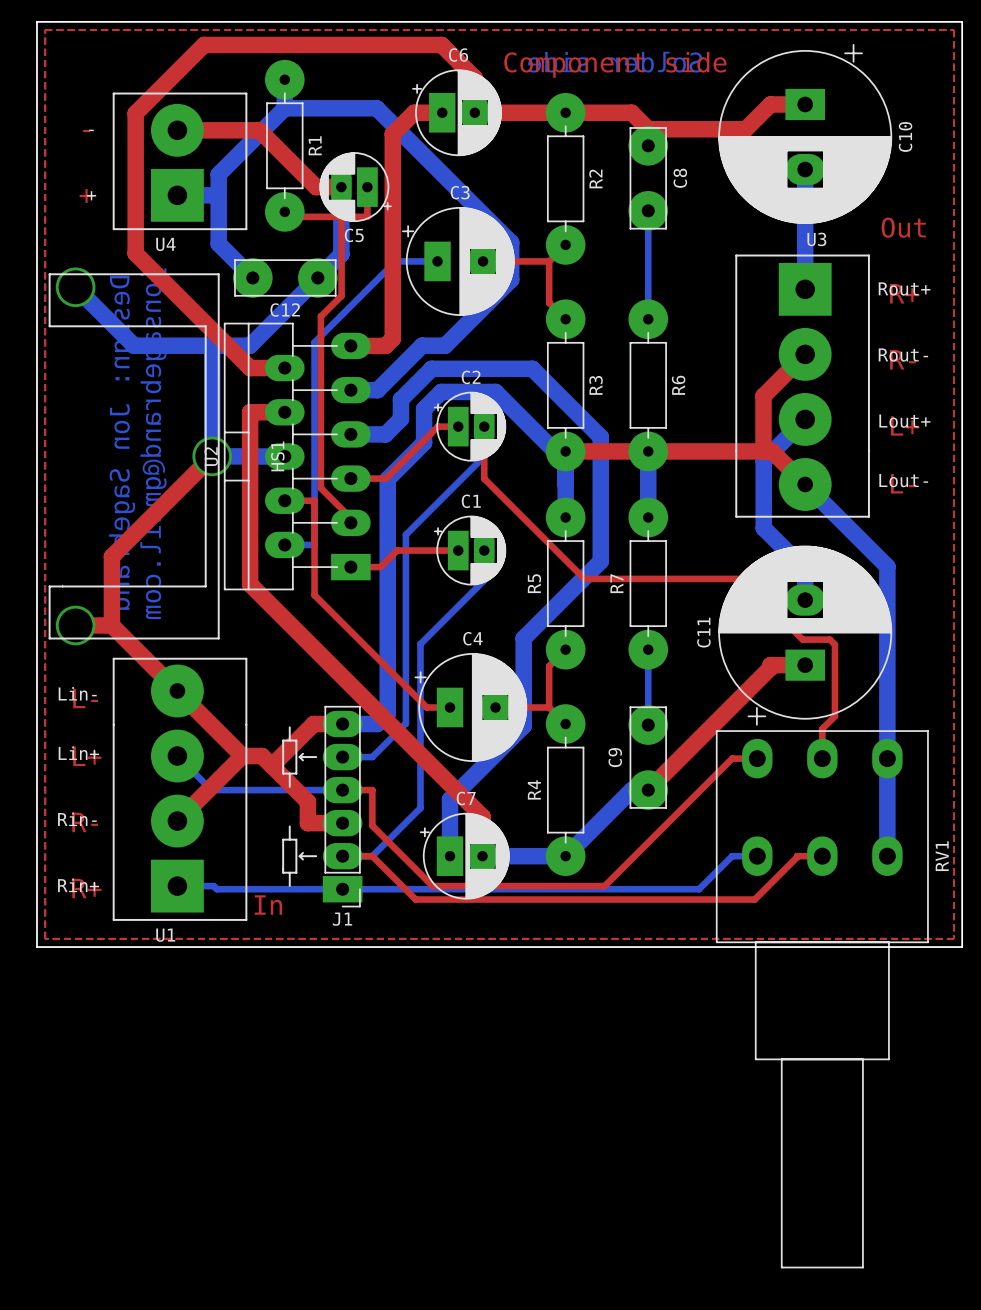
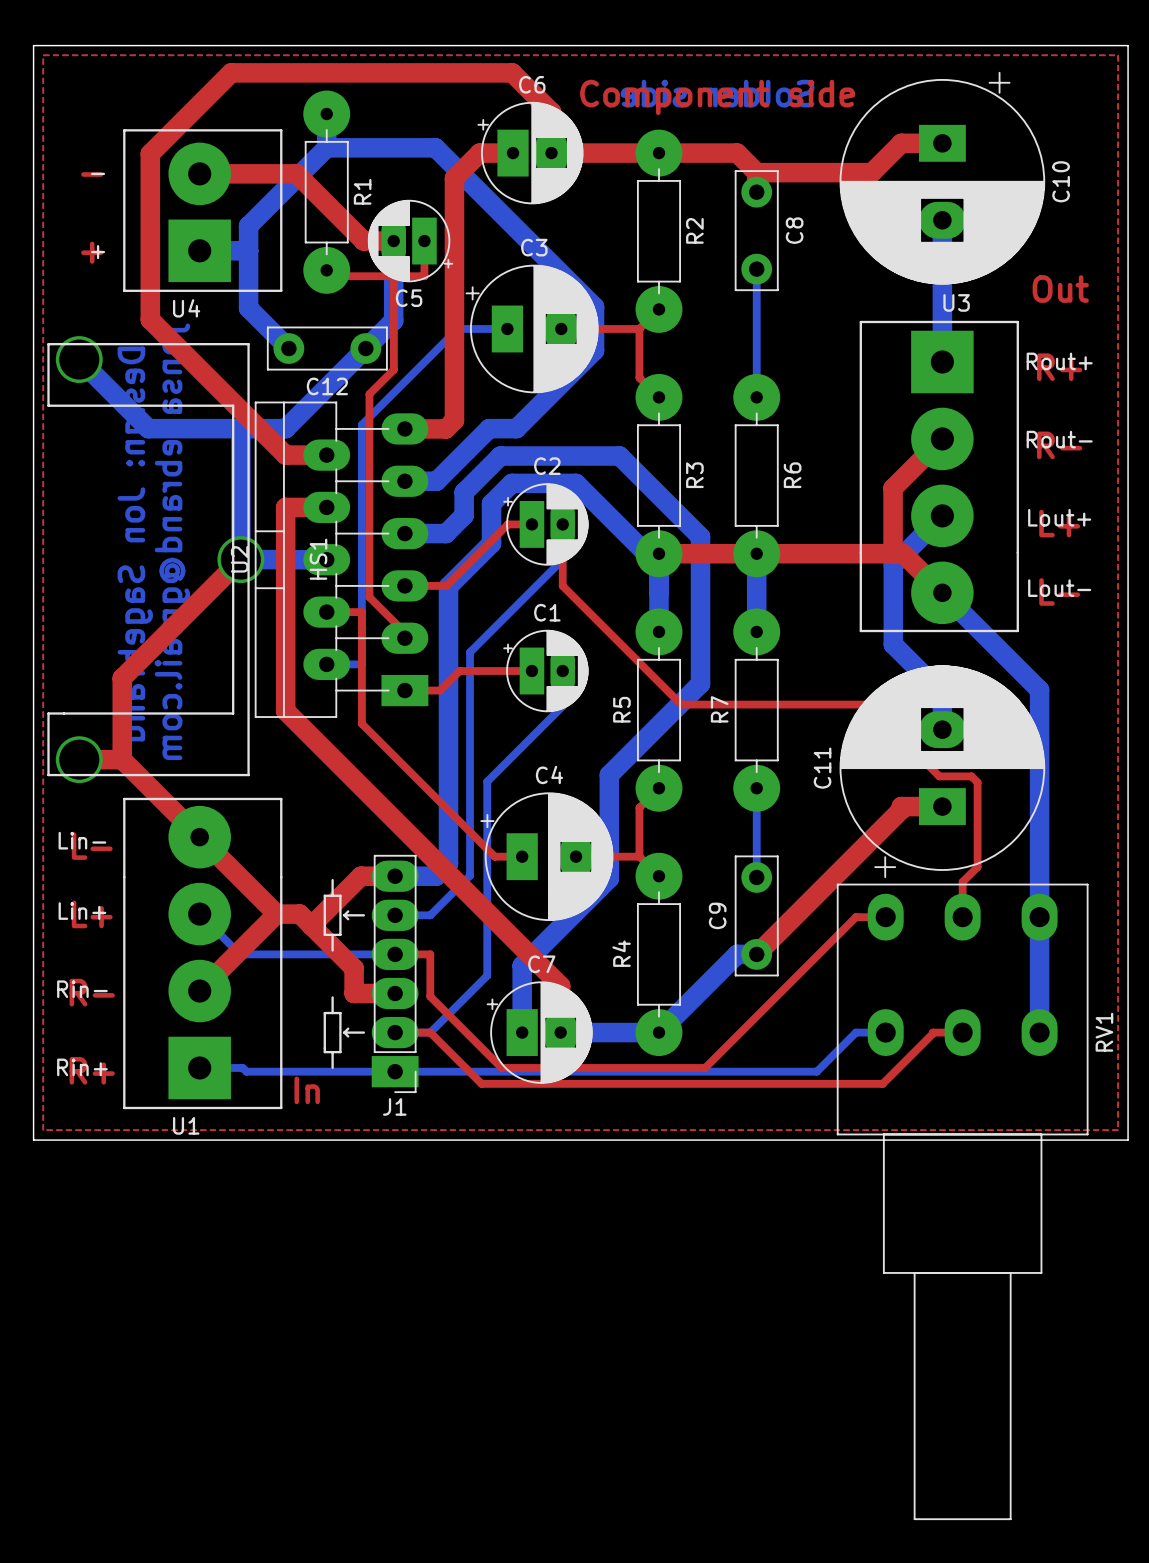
C8 footprint: [628, 125, 669, 231] -> [734, 170, 779, 292]
C12 footprint: [232, 258, 338, 298] -> [266, 326, 388, 371]
C9 footprint: [628, 705, 669, 810] -> [734, 855, 779, 977]

